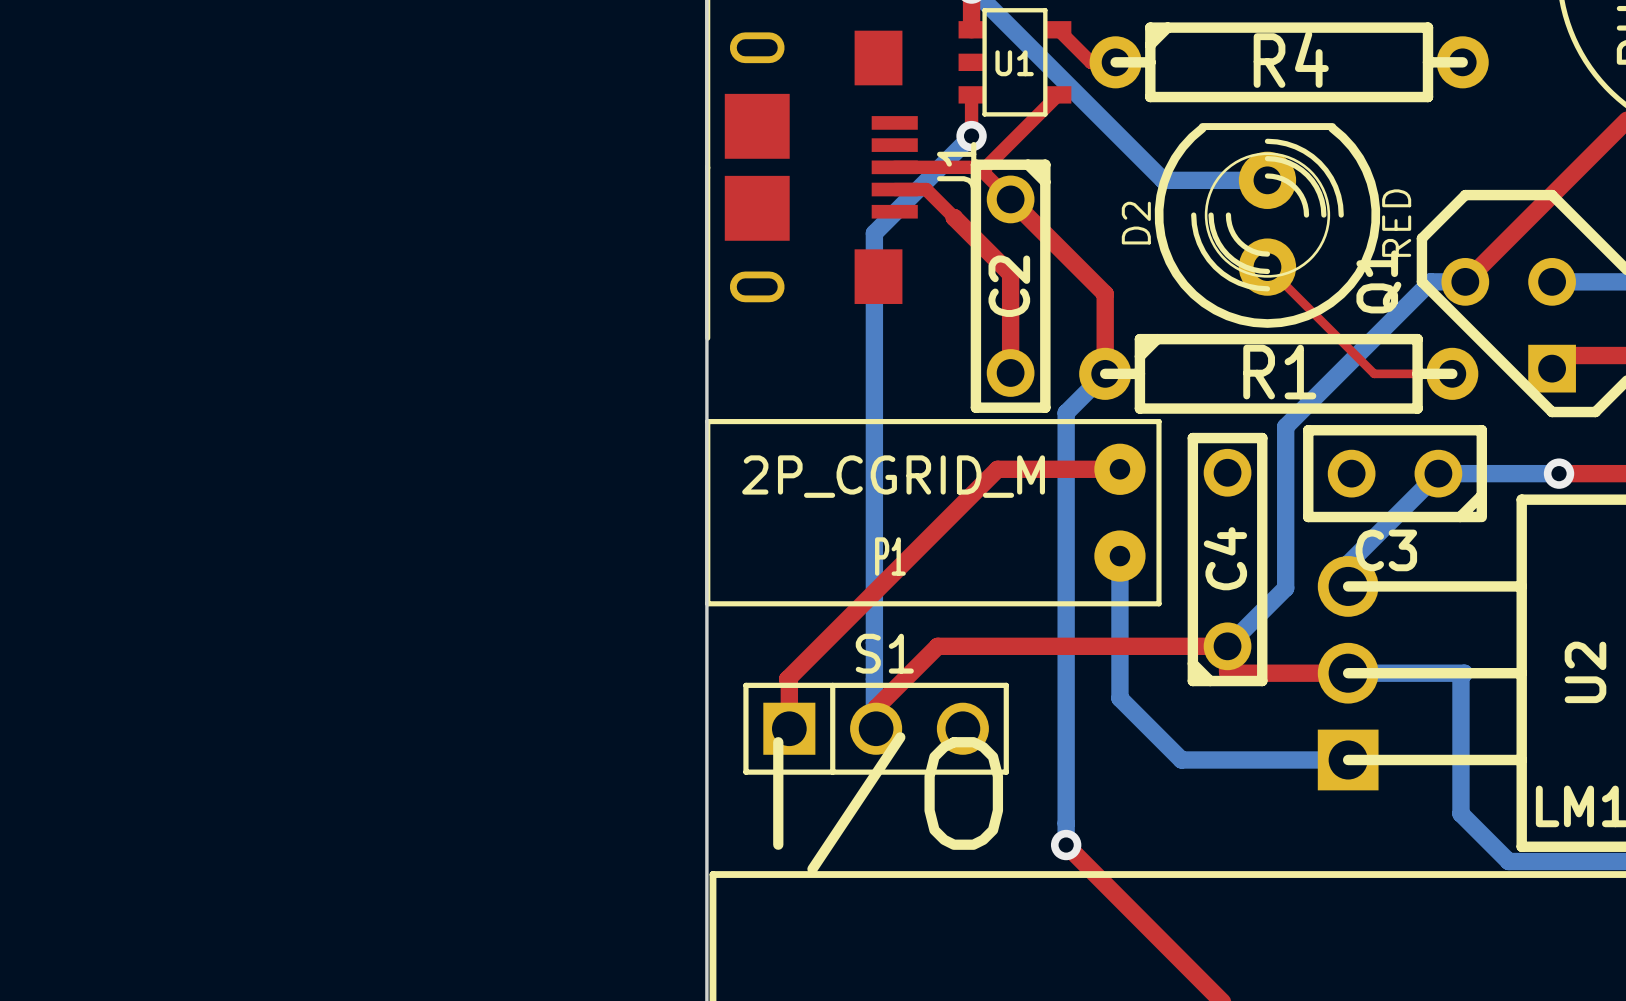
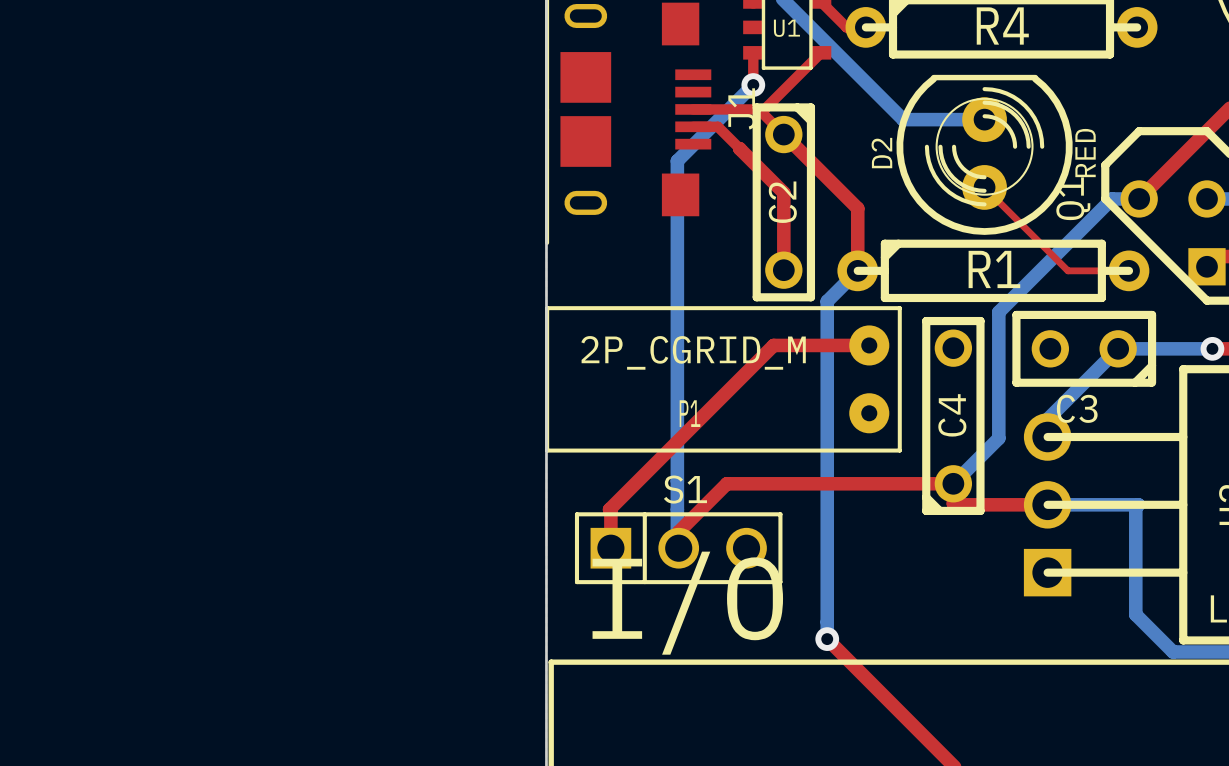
bottom track: (1119, 556) (1119, 698) (1181, 759) (1348, 759) -> none

